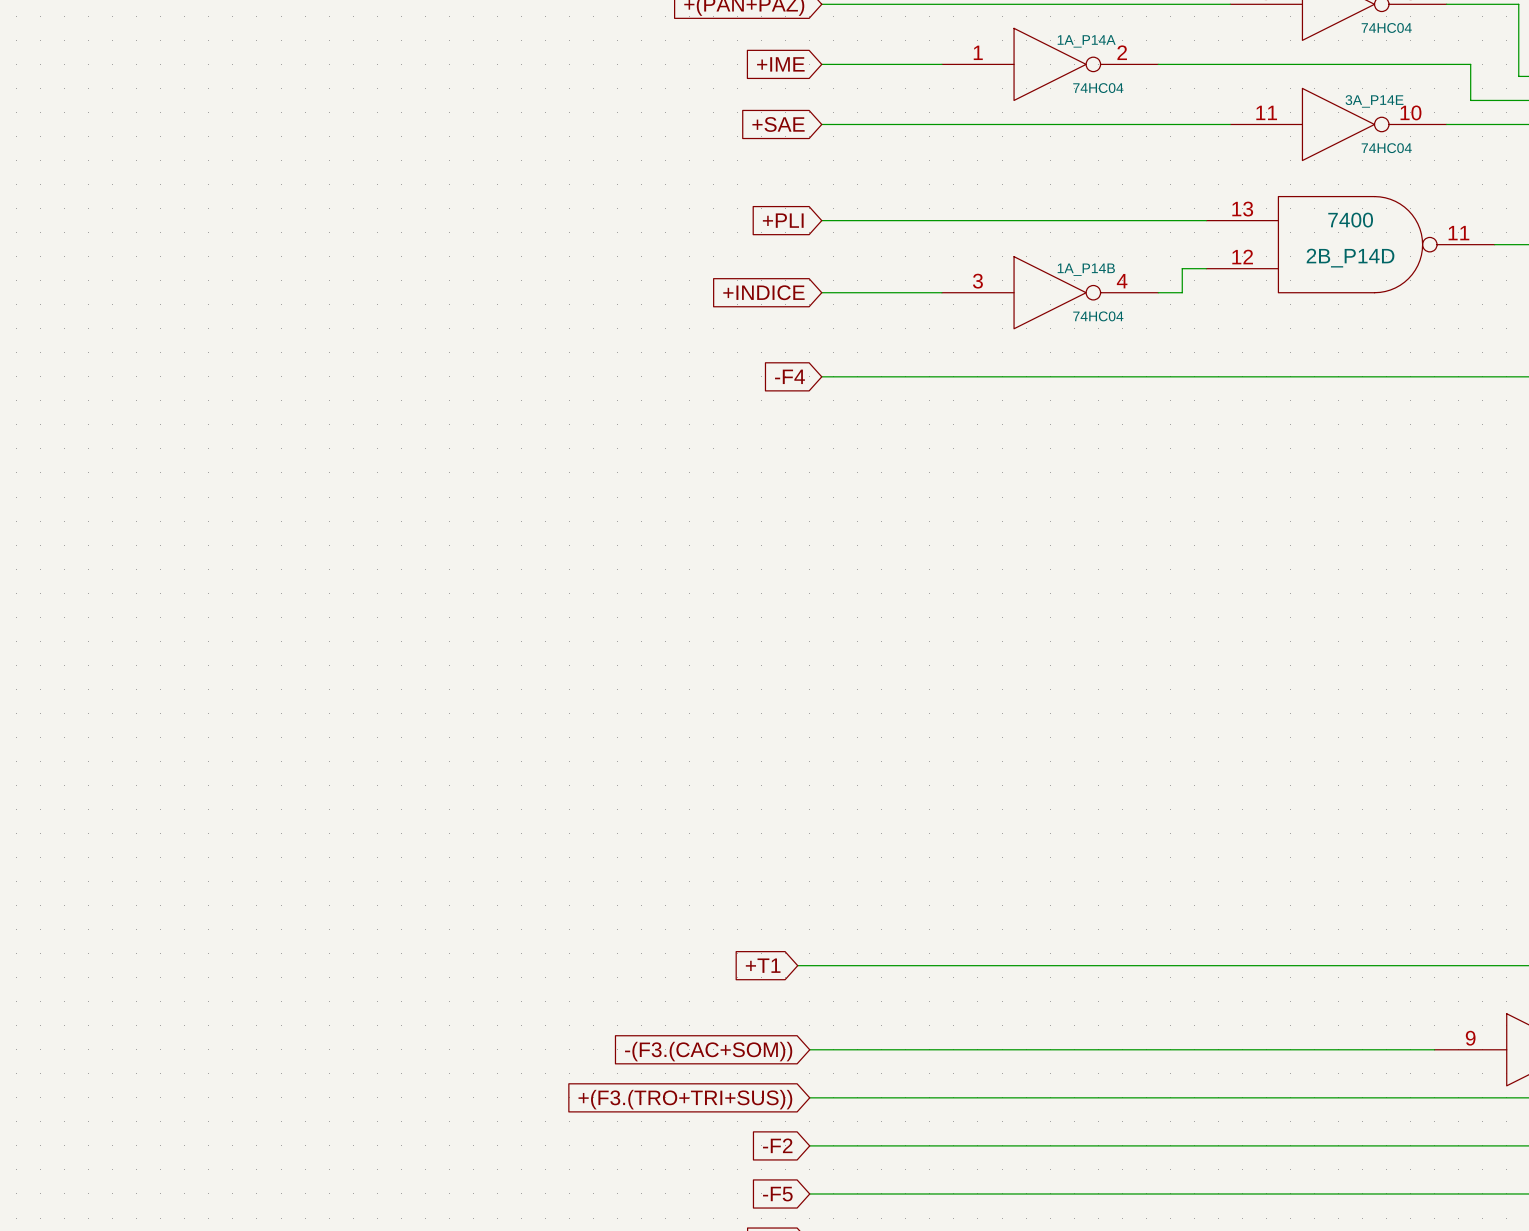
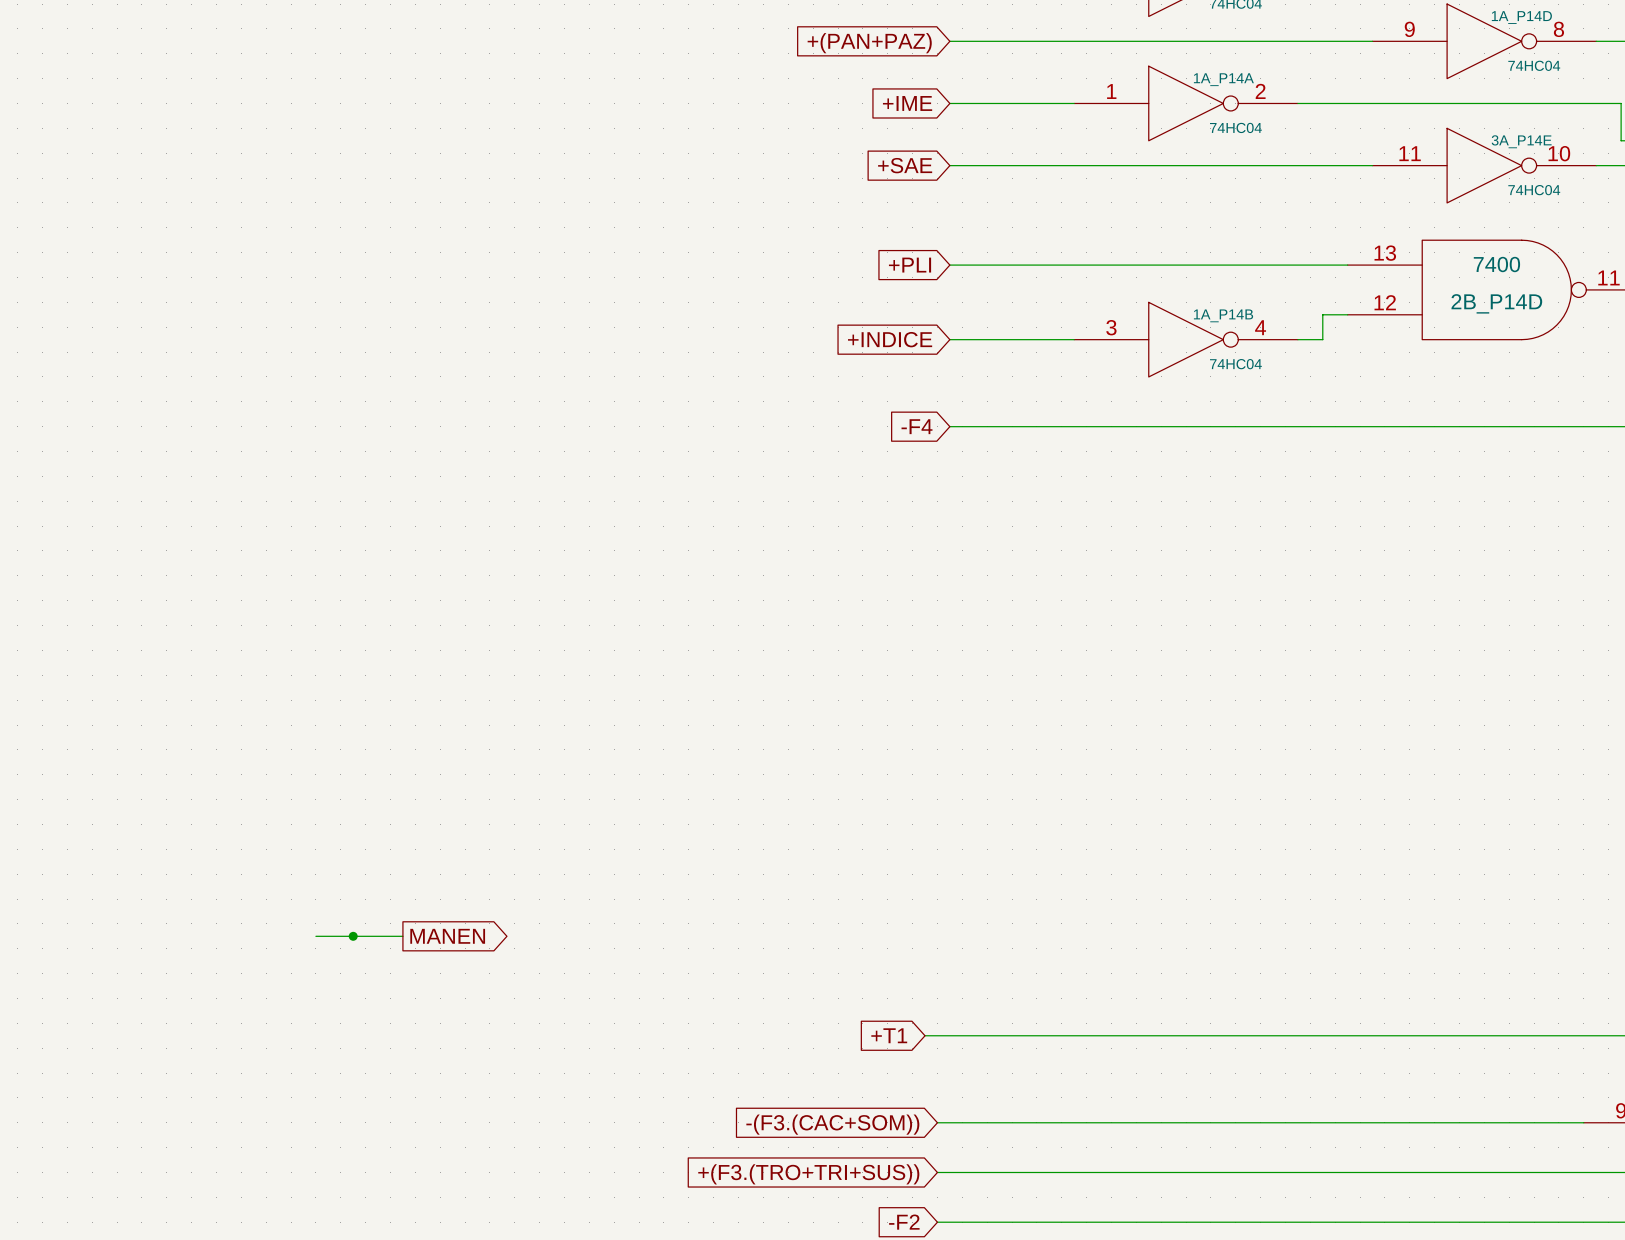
wire: none -> (315, 936) (402, 936)
junction: none -> (353, 936)
global label: none -> MANEN (447, 936)

